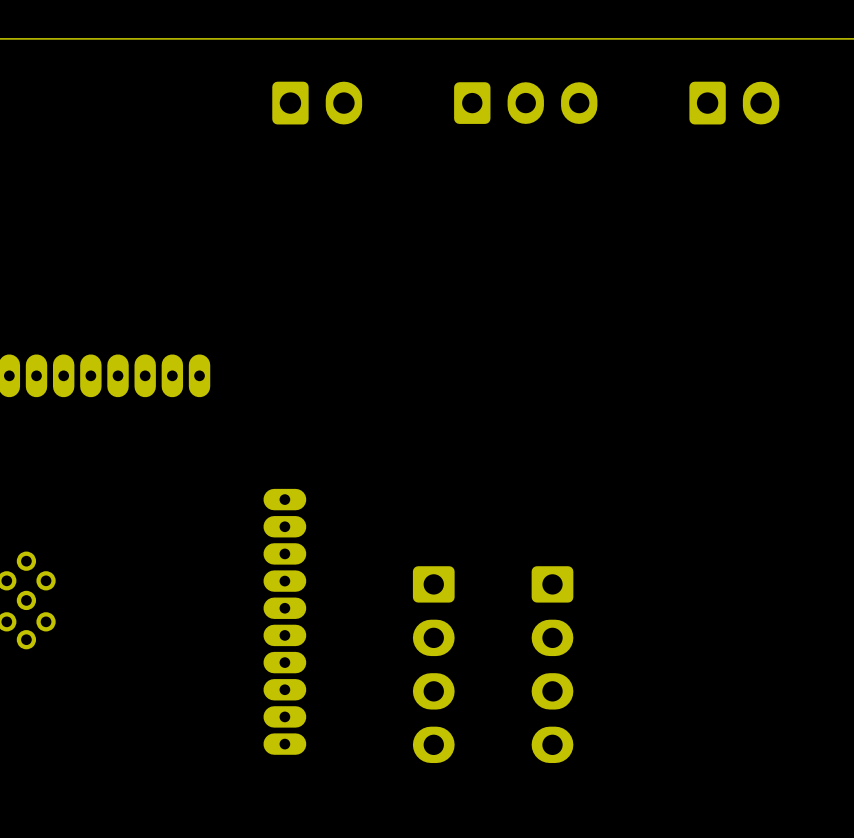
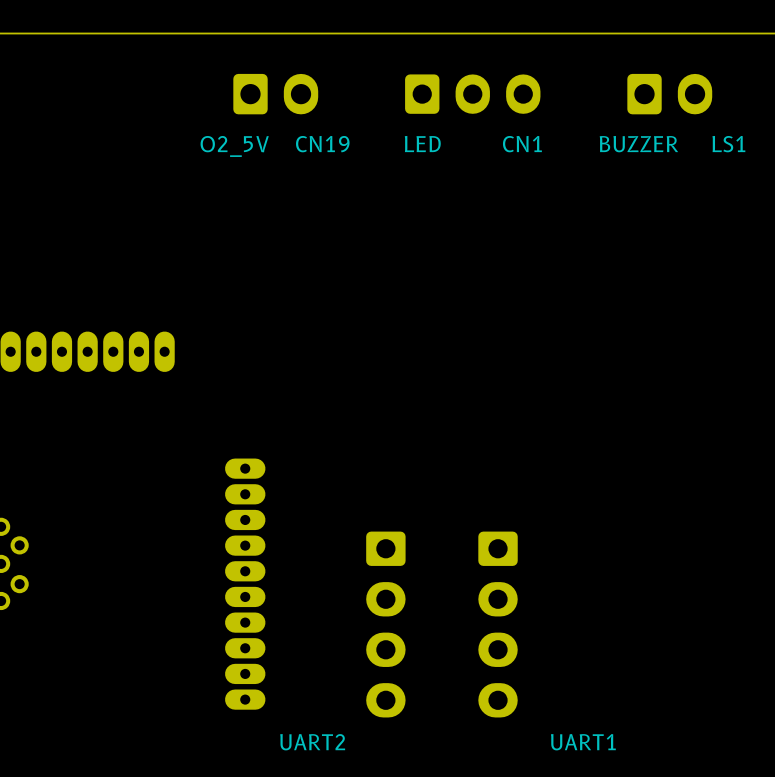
CN19 name: none -> CN19 (322, 144)
CN1 text: none -> LED (422, 144)
CN1 name: none -> CN1 (522, 144)
LS1 text: none -> BUZZER (638, 144)
LS1 name: none -> LS1 (728, 144)
CN19 text: none -> O2_5V (234, 146)
part value: none -> UART2 (312, 742)
part value: none -> UART1 (583, 742)

